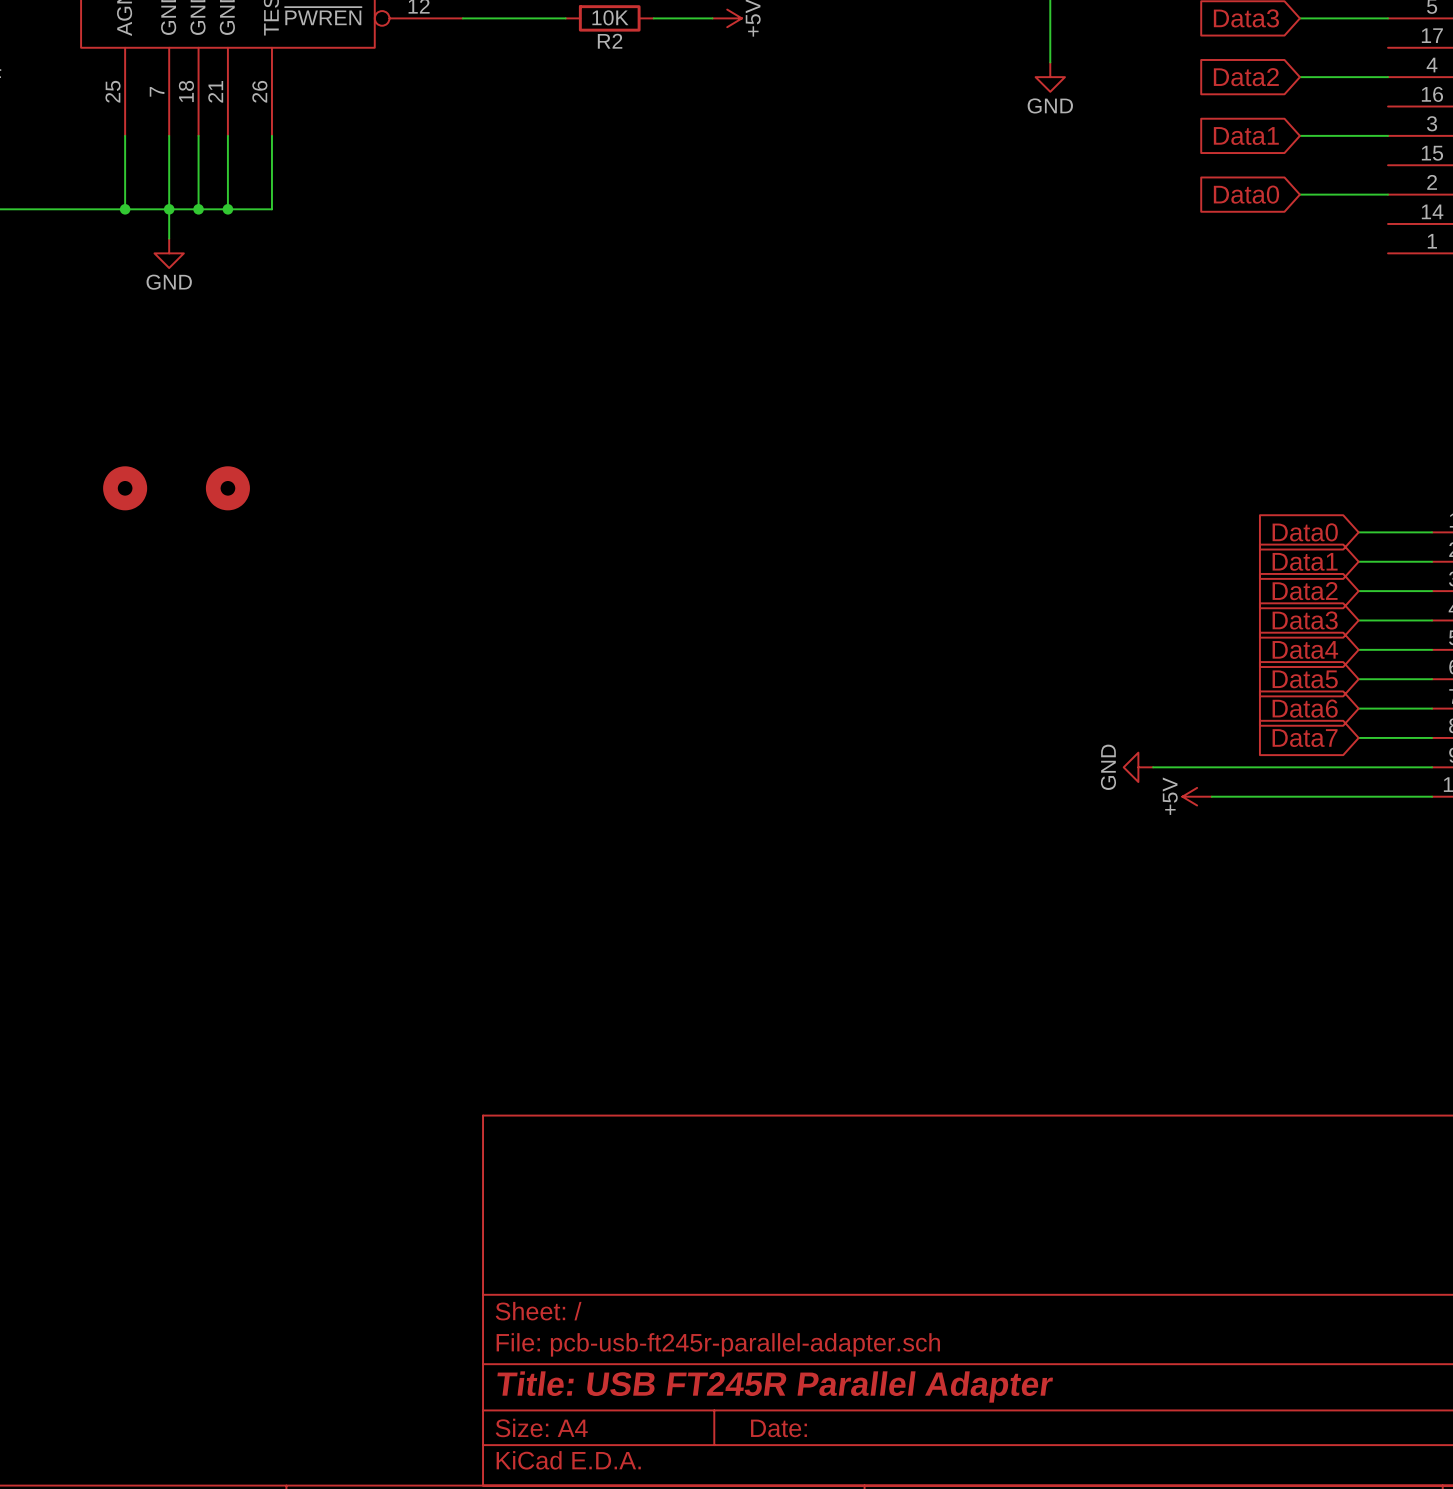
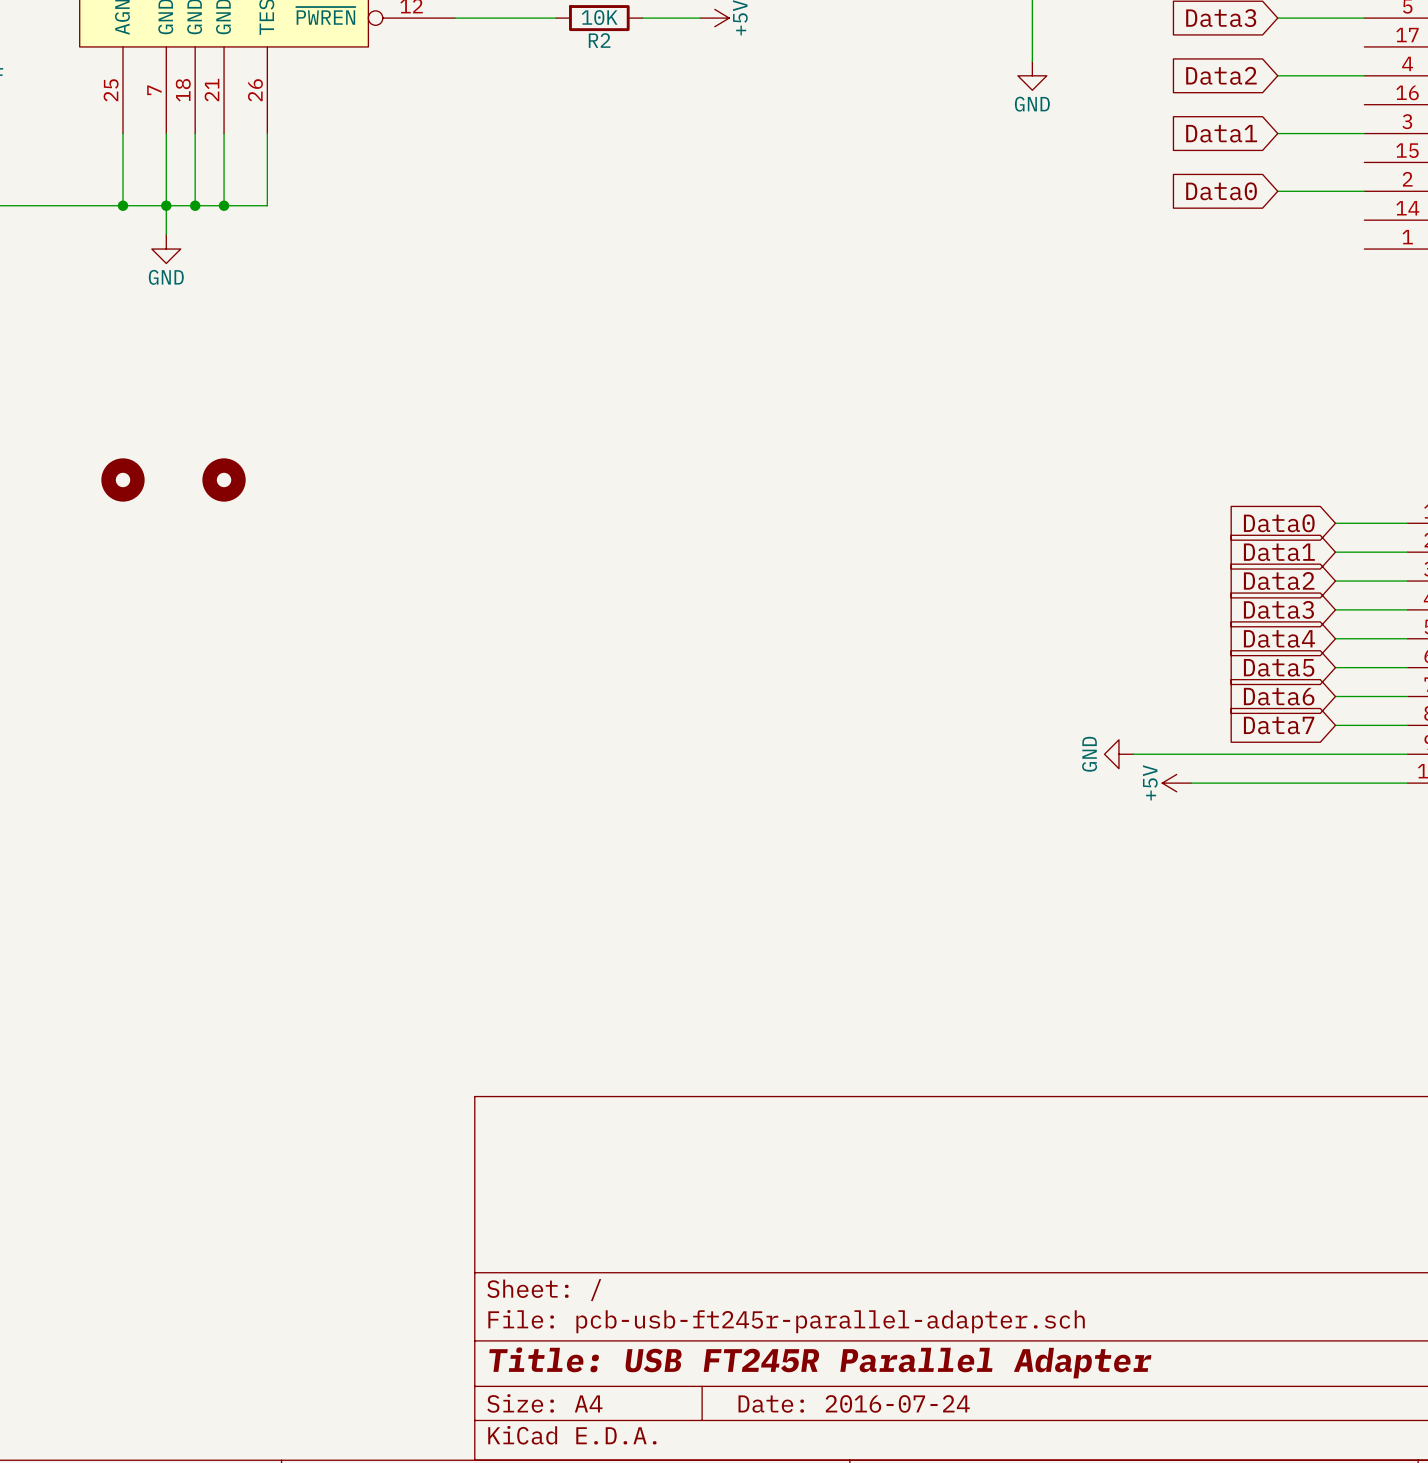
title block: Date: (778, 1428) -> Date: 2016-07-24 (854, 1403)

